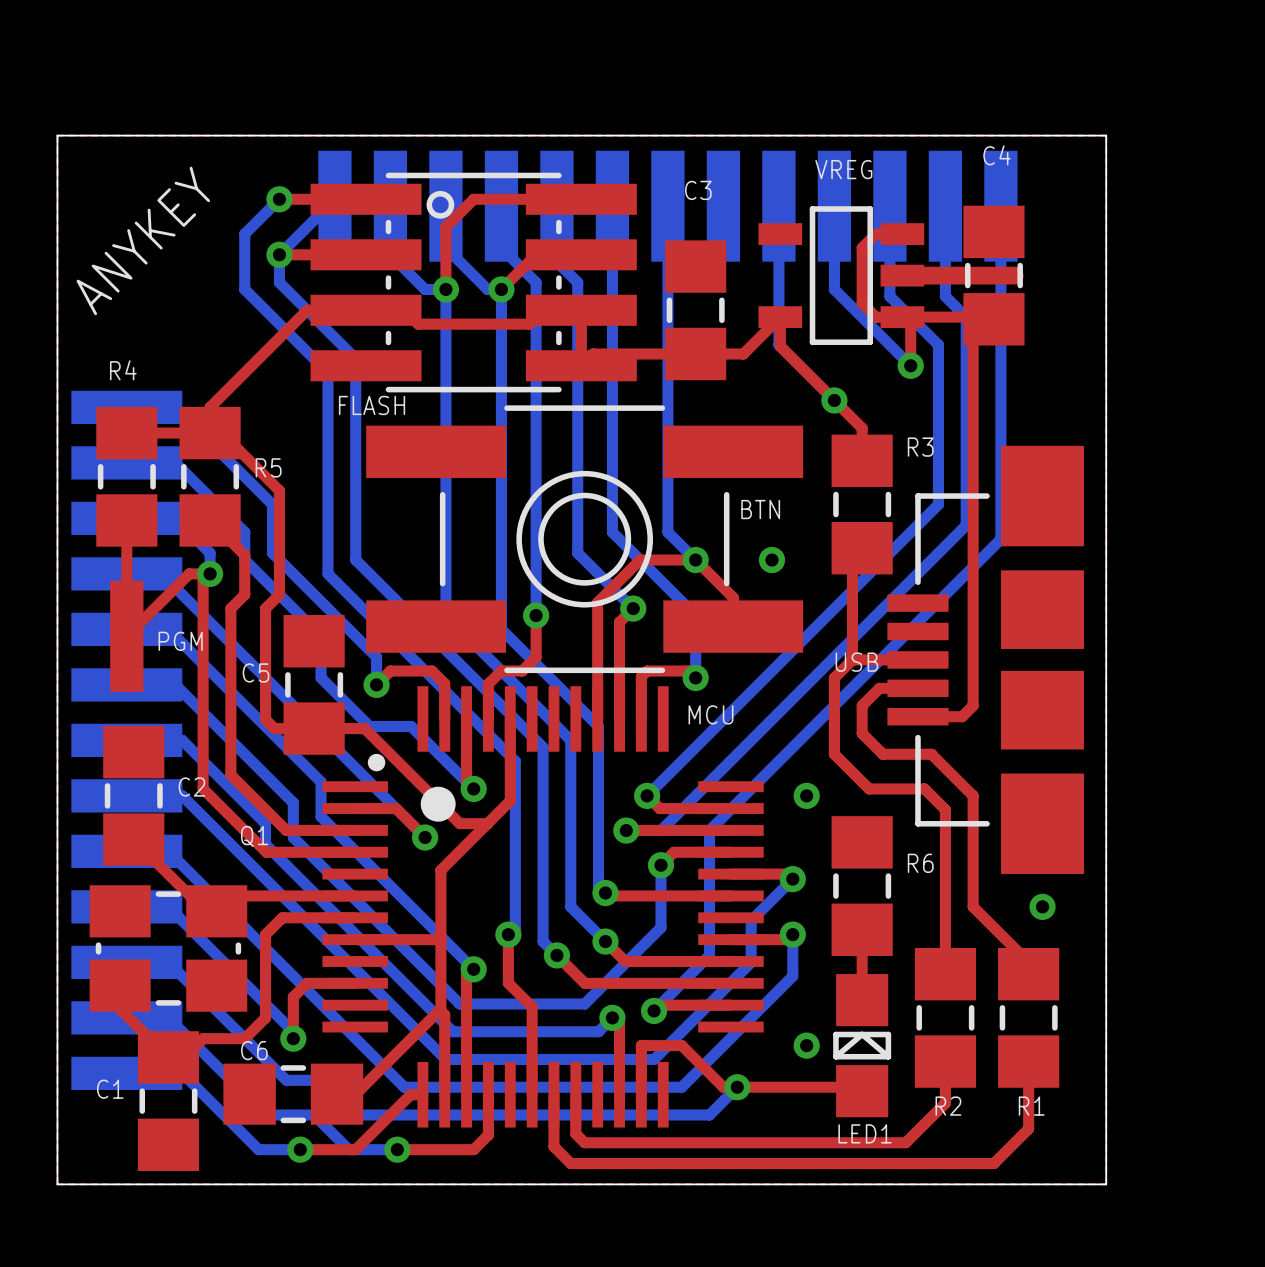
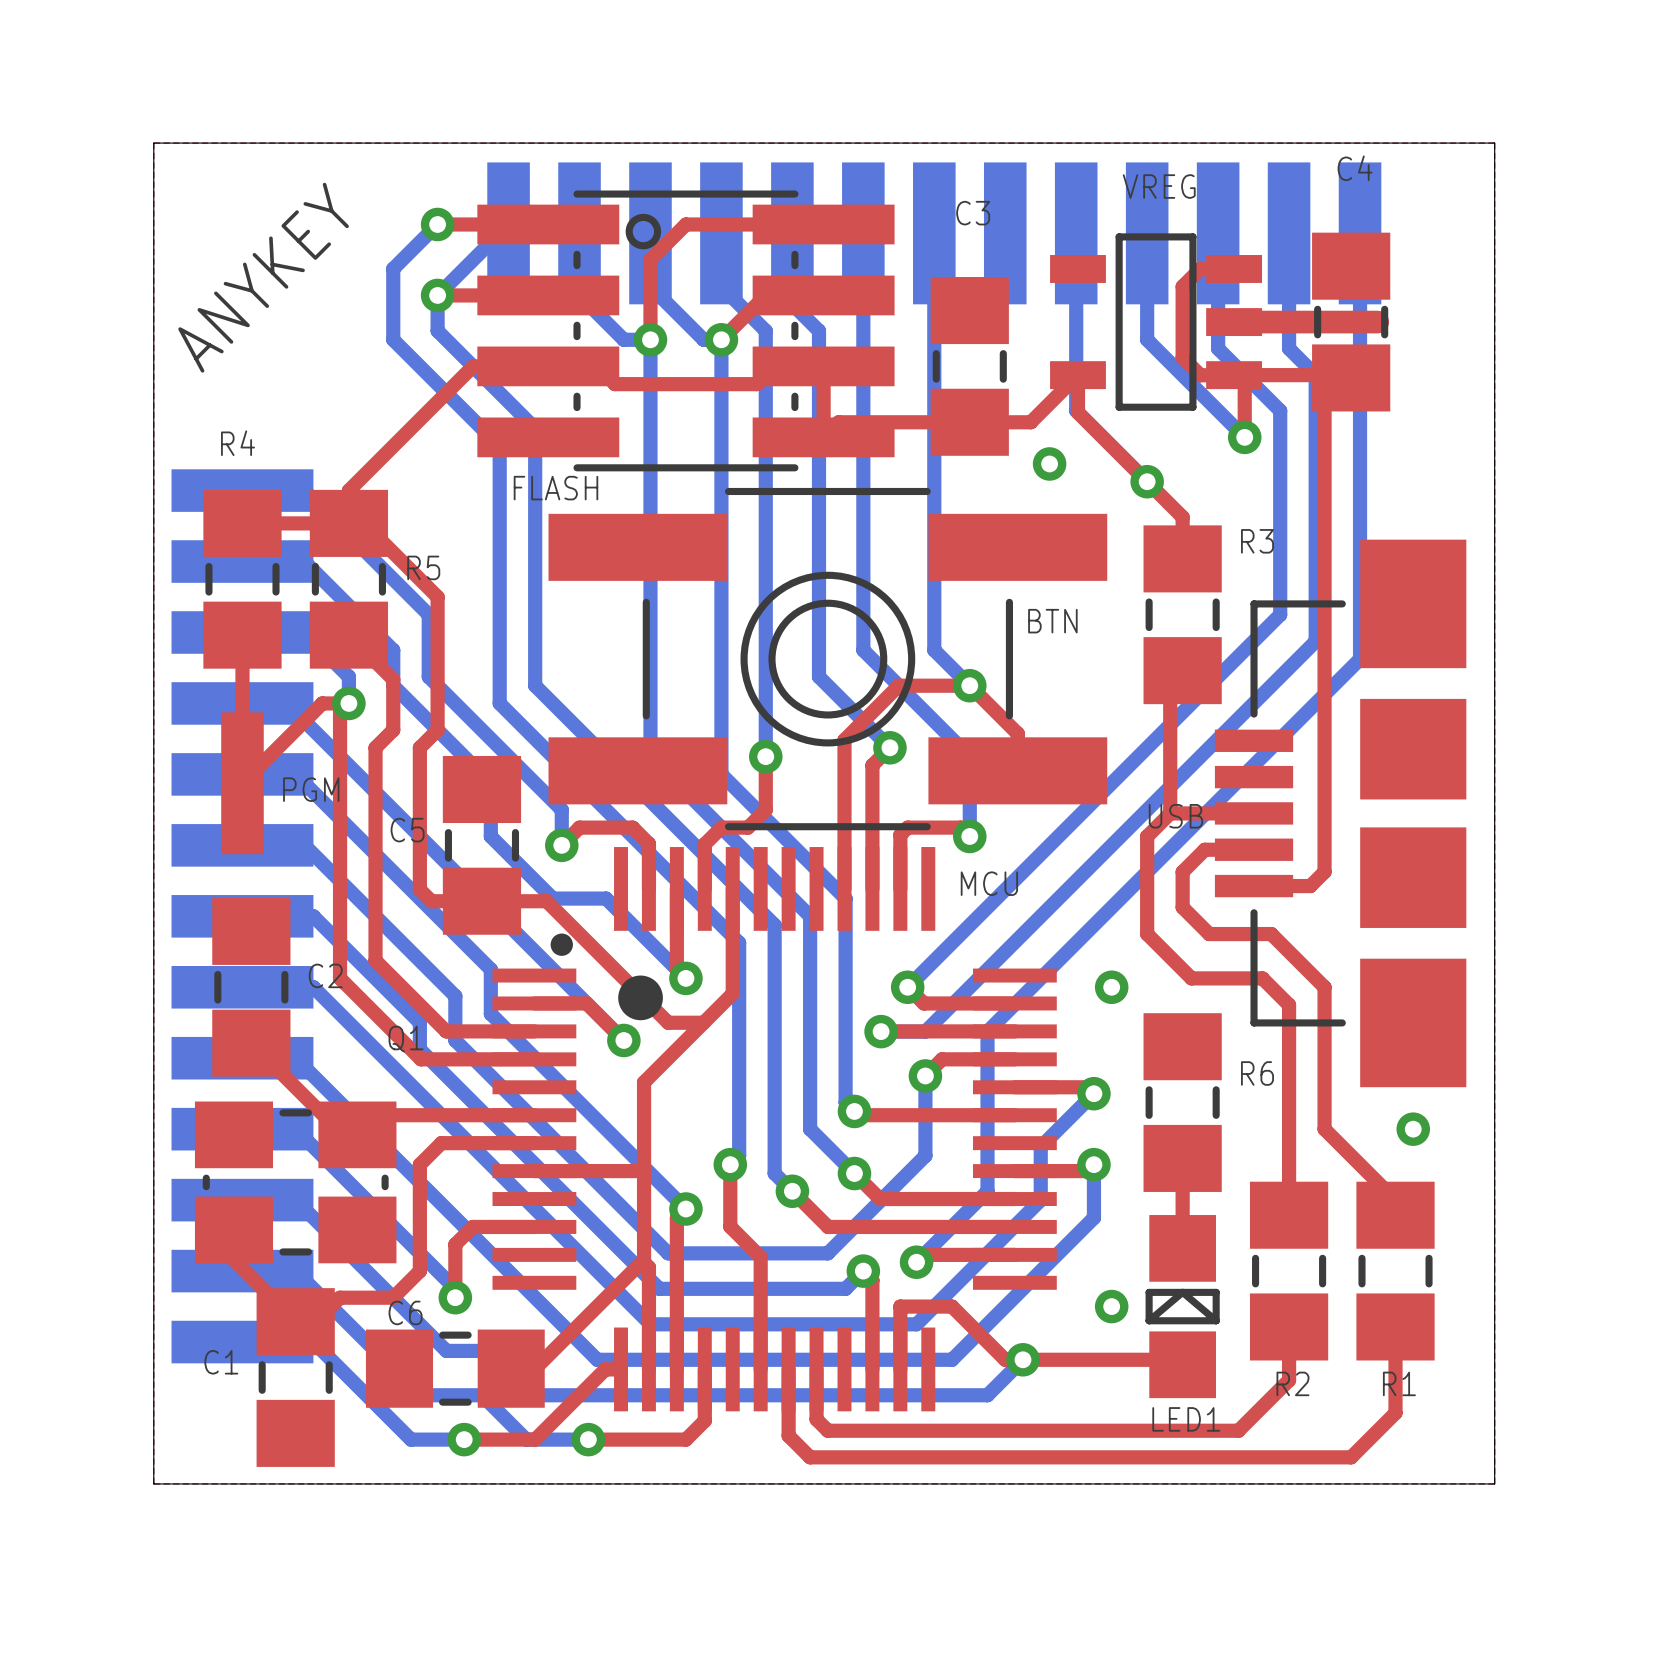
via position: (771, 560) -> (1049, 463)

